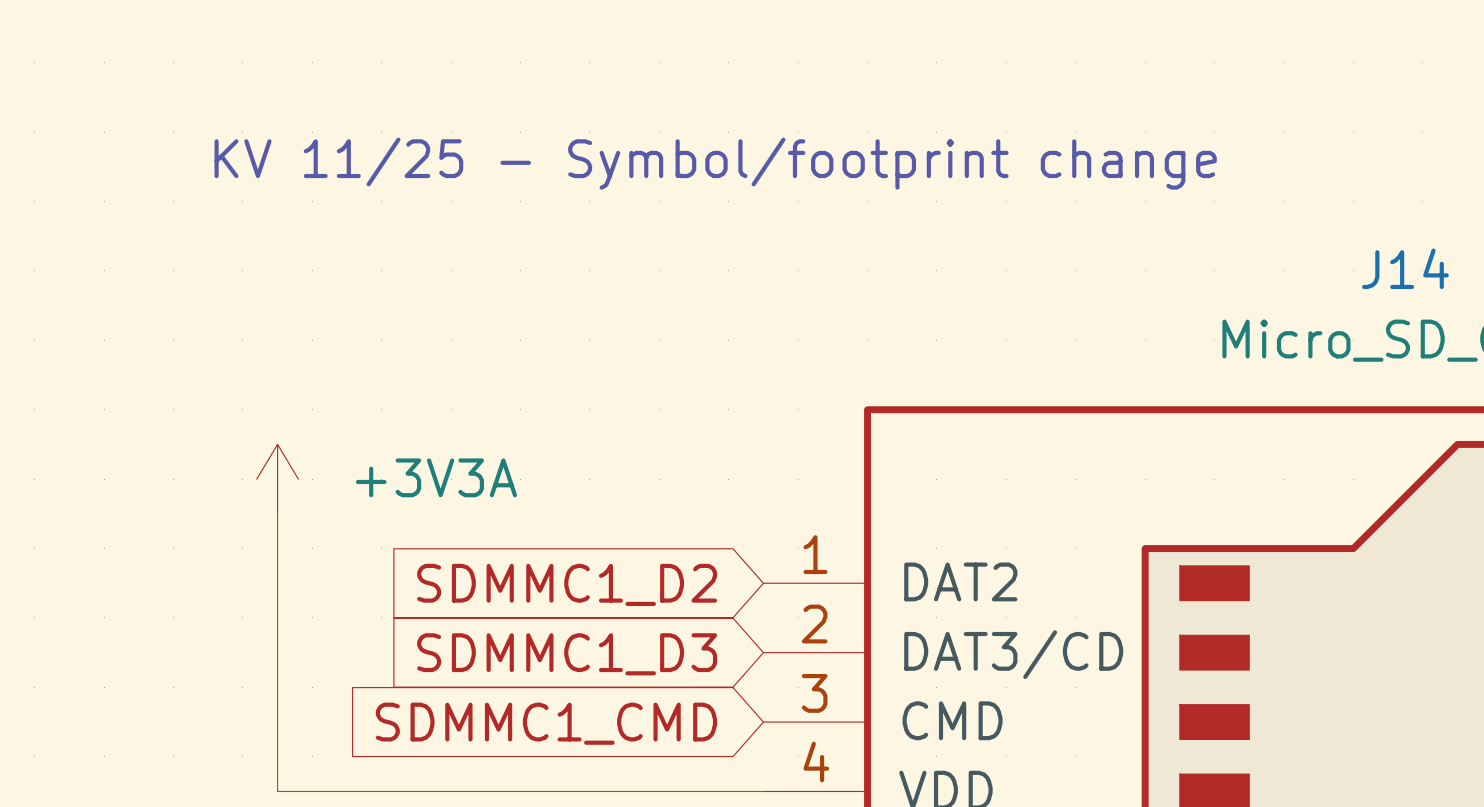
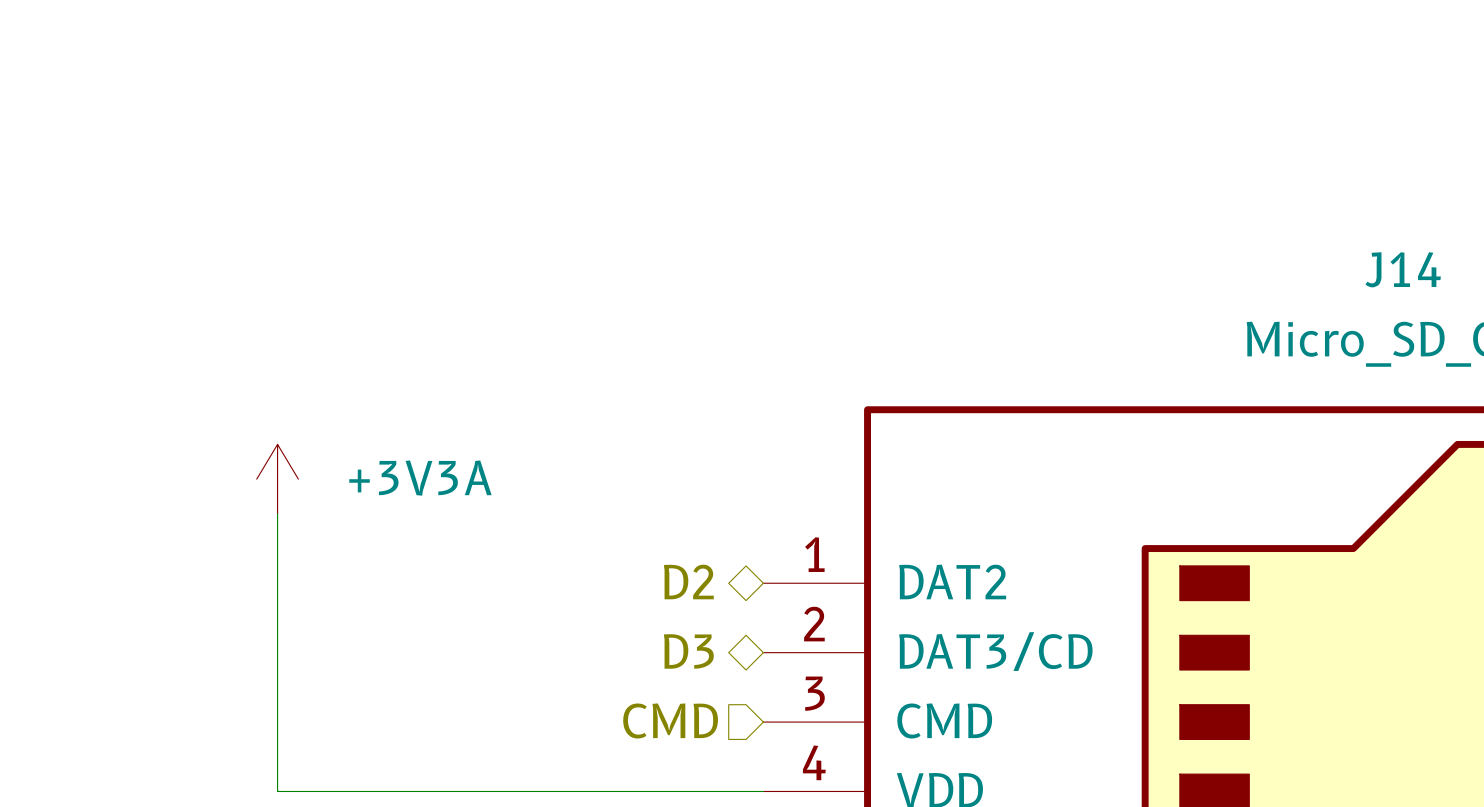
text: KV 11/25 - Symbol/footprint change (715, 163) -> none
hierarchical label: none -> D2 (688, 581)
global label: SDMMC1_D2 (567, 584) -> none
hierarchical label: none -> D3 (688, 651)
global label: SDMMC1_D3 (567, 654) -> none
hierarchical label: none -> CMD (670, 720)
global label: SDMMC1_CMD (546, 723) -> none

